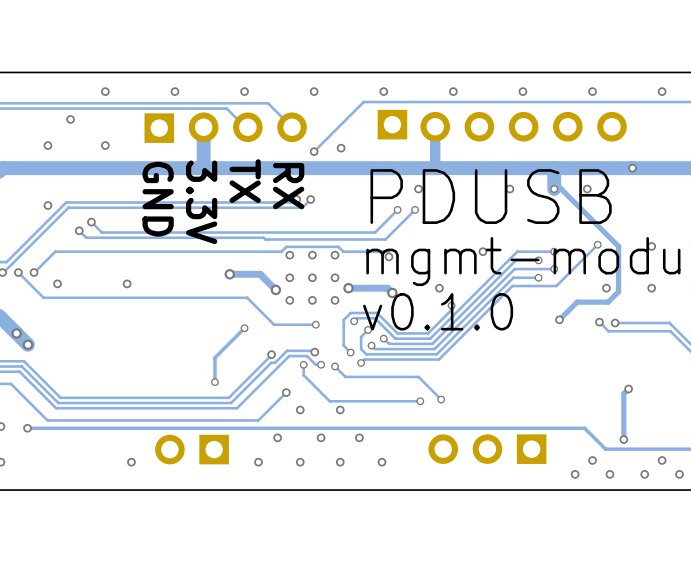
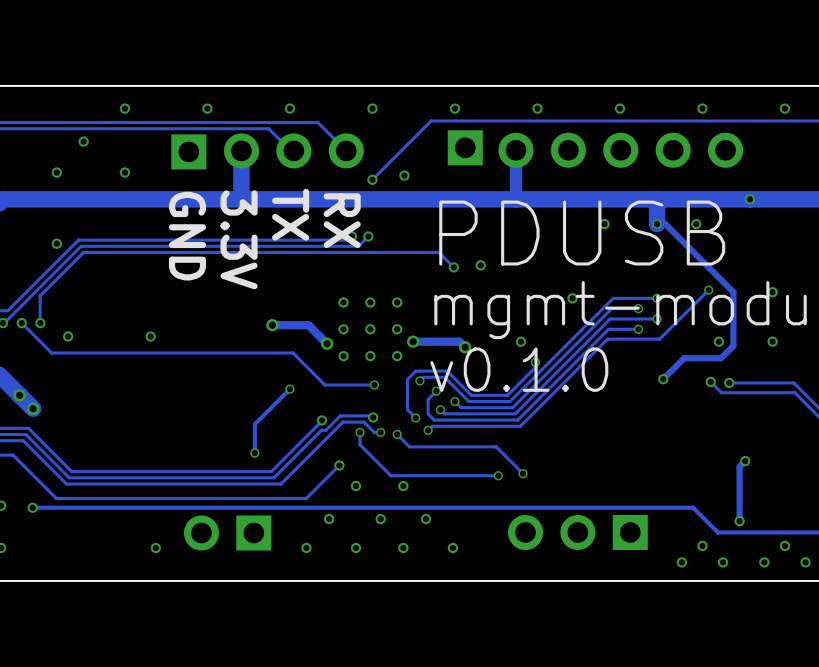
via: (418, 189) -> none
track: (397, 209) (375, 232) (101, 232) (91, 222) -> none
via: (397, 209) -> none
track: (415, 209) (385, 239) (86, 237) (79, 230) -> none
via: (415, 209) -> none
via: (91, 222) -> none
via: none -> (480, 265)
via: none -> (453, 267)
via: (79, 230) -> none
track: (388, 256) (388, 251) (343, 251) (338, 246) (286, 246) (281, 251) (55, 251) (33, 273) -> (453, 267) (438, 252) (83, 252) (40, 295) (40, 323)
via: (388, 256) -> none

